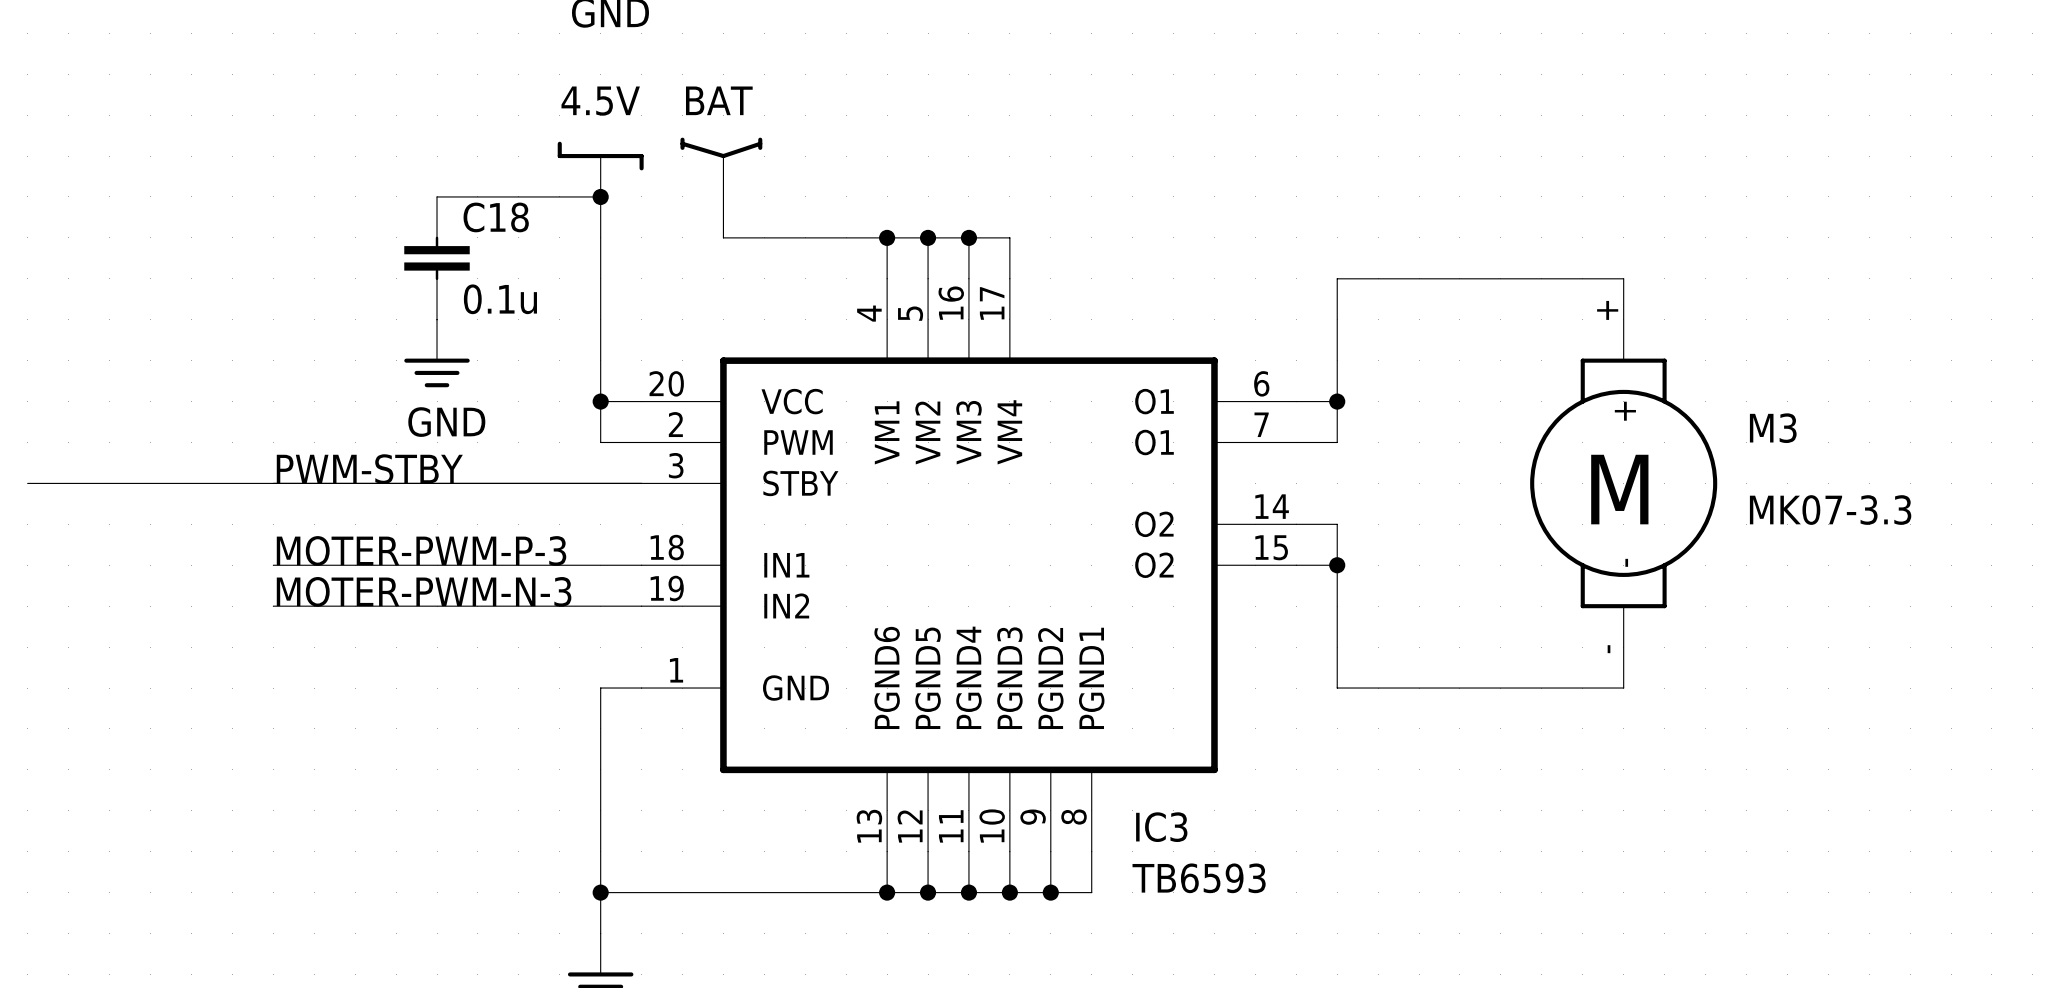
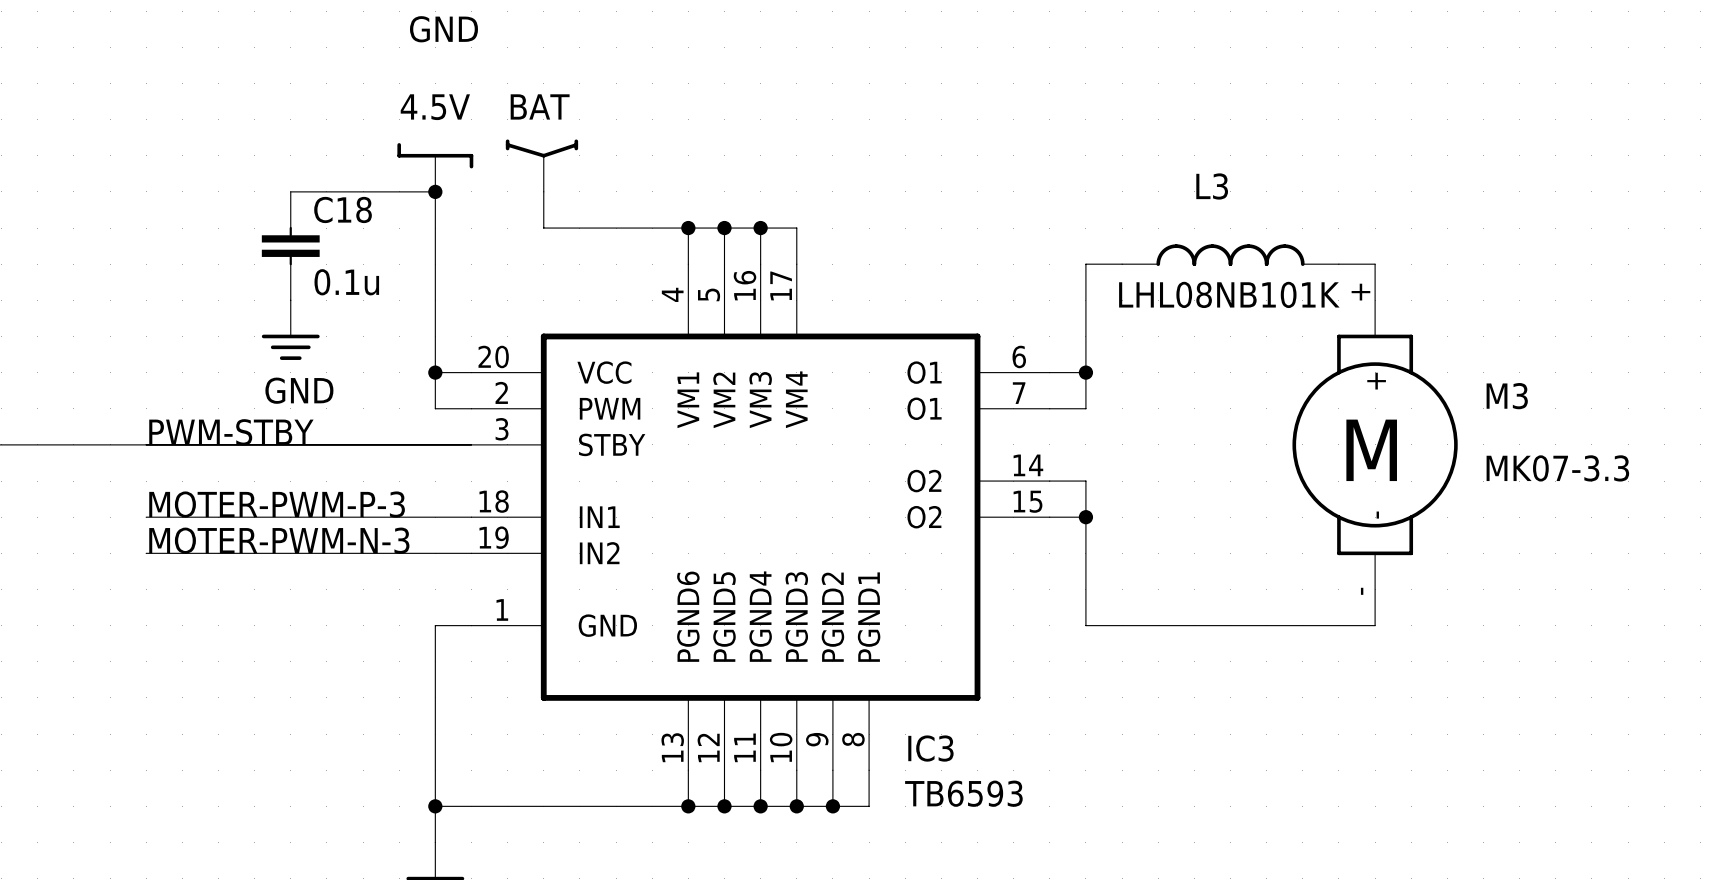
L3: none -> LHL08NB101K (1230, 255)
wire: (1378, 278) (1623, 278) -> (1375, 264) (1338, 264)
M3 position: (1623, 483) -> (1375, 444)
wire: none -> (1338, 625) (1375, 625)

